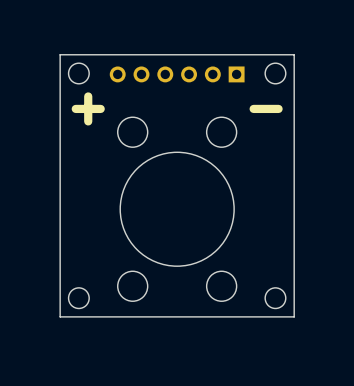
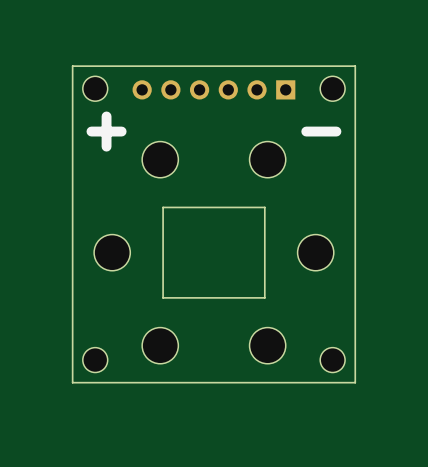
round board edge: [119, 151, 235, 267] -> none
board edge: none -> (264, 207) (264, 297) (163, 297) (163, 207) (264, 207)
part: none -> (112, 252)
part: none -> (315, 252)

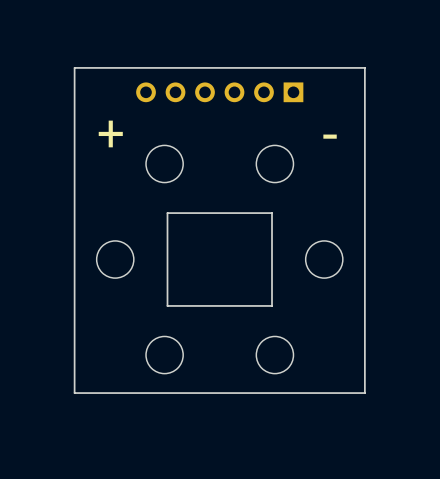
part: (95, 88) -> none
part: (332, 88) -> none
part: (95, 360) -> none
part: (332, 360) -> none

